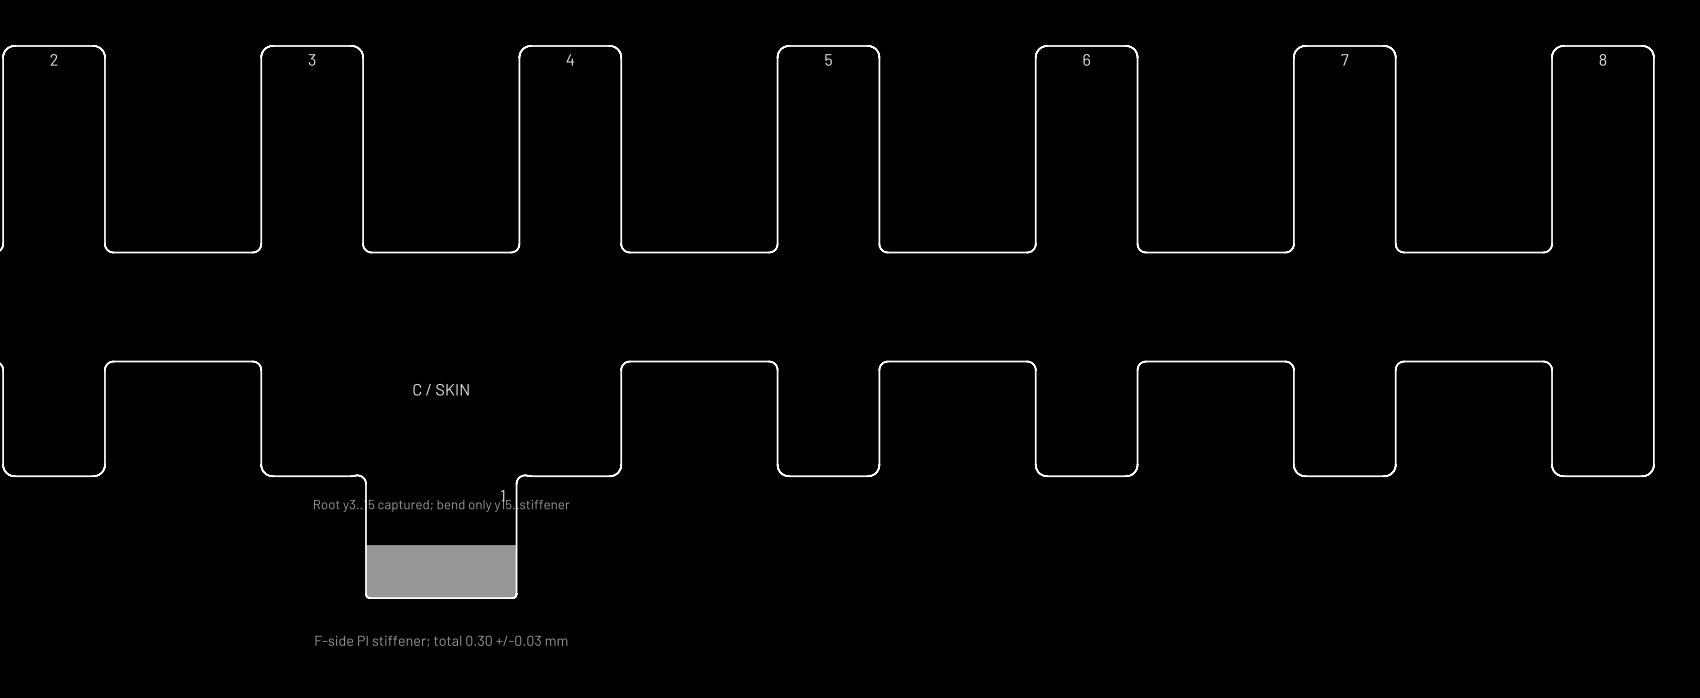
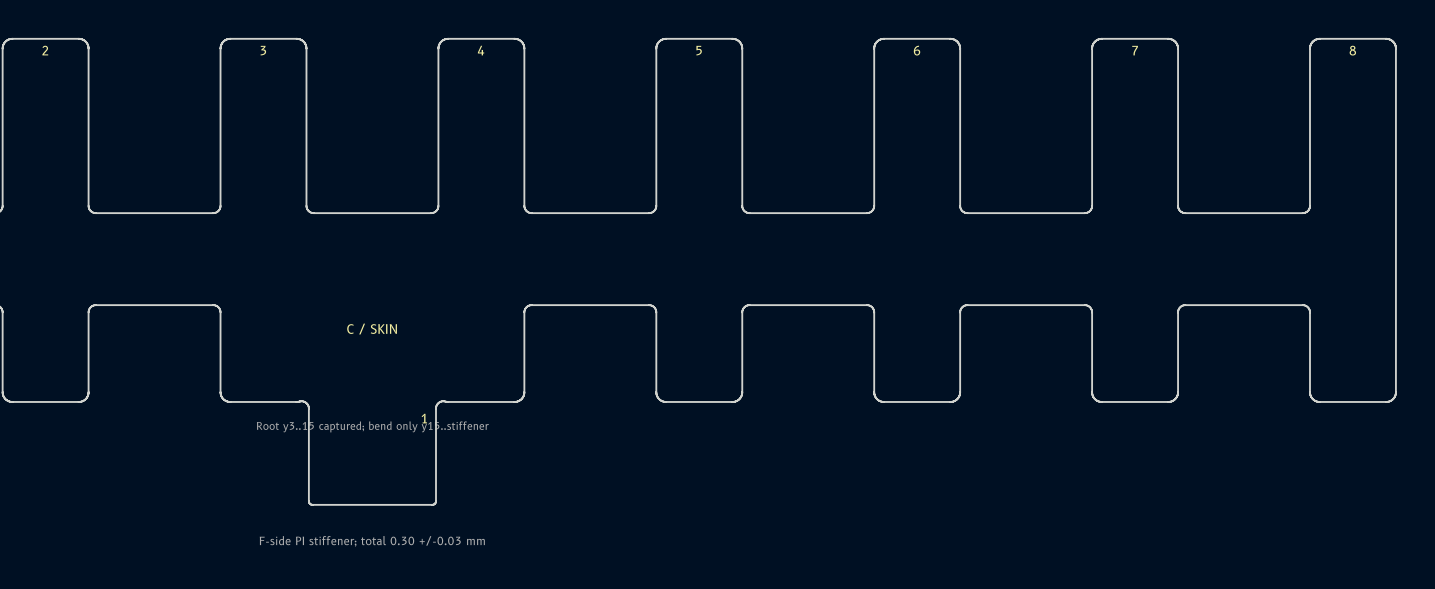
drawing: [365, 545, 517, 599] -> none

